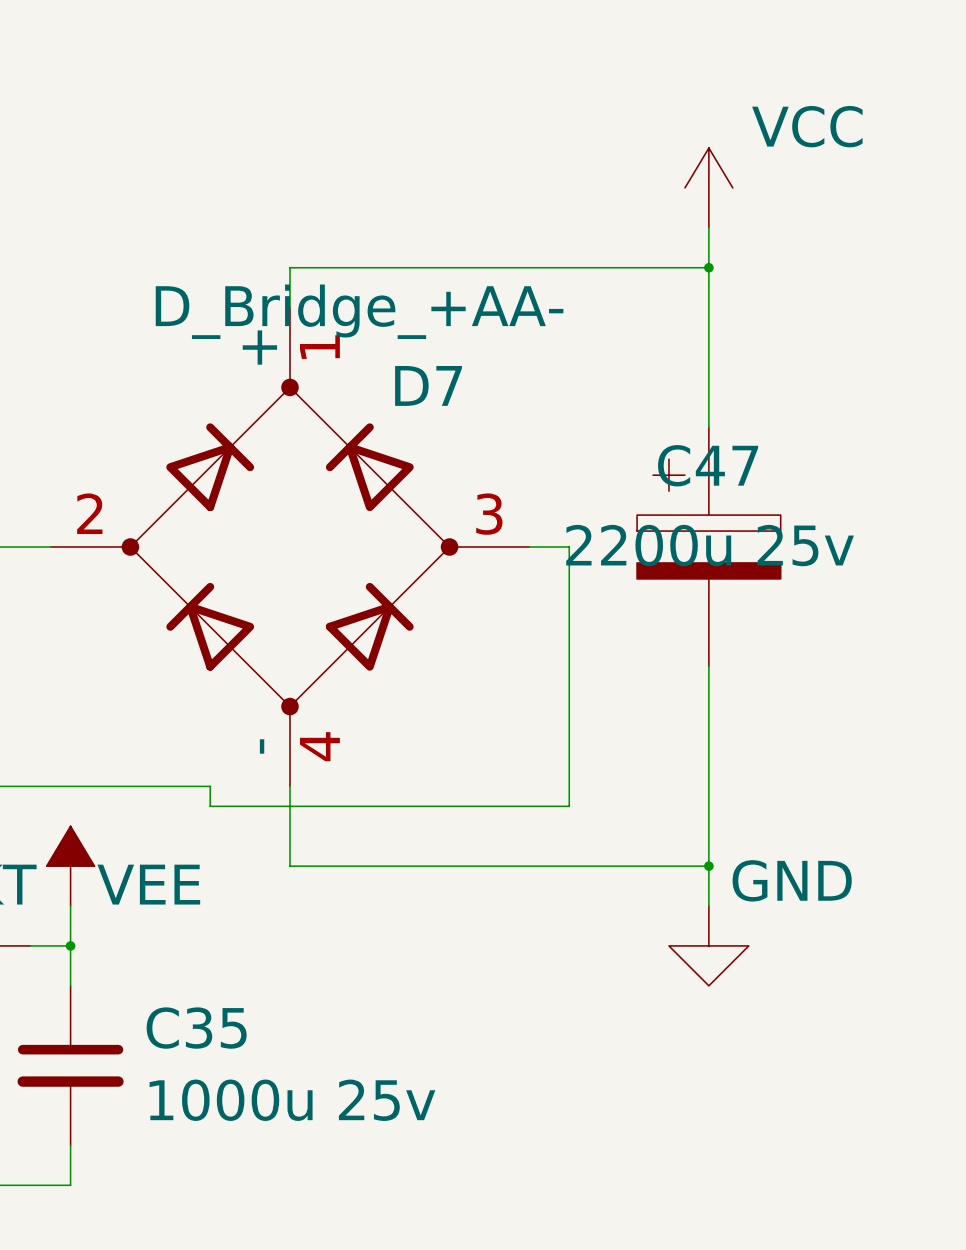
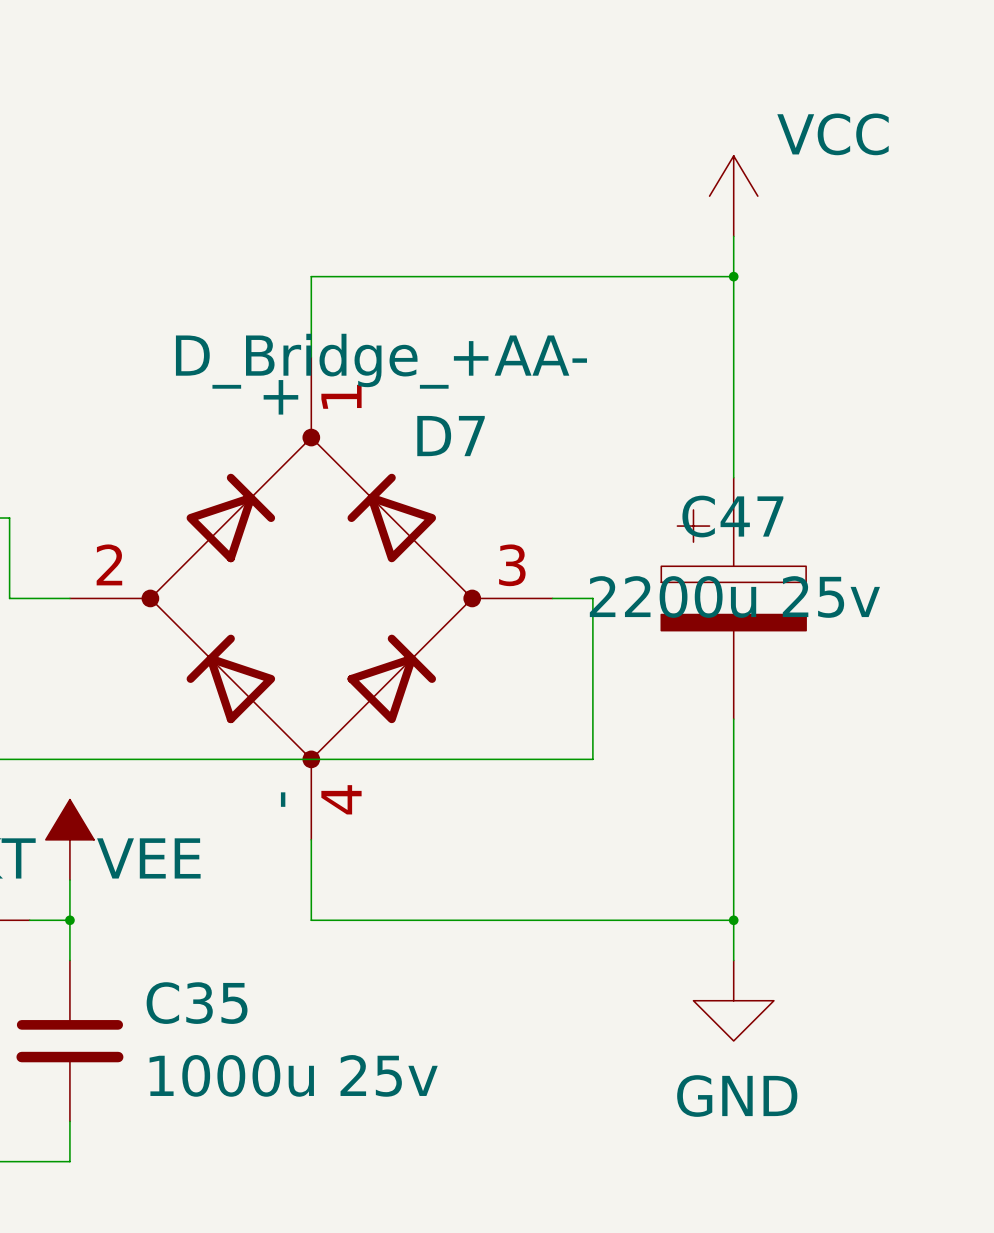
power symbol position: VCC (708, 187) -> VCC (733, 196)
wire: (708, 227) (708, 427) -> none
wire: (708, 267) (289, 267) (289, 307) -> none
junction position: (708, 267) -> (733, 276)
wire: none -> (733, 236) (733, 477)
wire: none -> (733, 276) (311, 276) (311, 357)
wire: (10, 547) (50, 547) -> (9, 518) (9, 598) (69, 598)
D7 position: (289, 547) -> (311, 598)
wire: (529, 547) (569, 547) (569, 806) (210, 806) (210, 786) -> (552, 598) (592, 598) (592, 759) (210, 759)
C47 position: (708, 547) -> (733, 598)
wire: (708, 666) (708, 906) -> (733, 719) (733, 960)
wire: (289, 786) (289, 866) (708, 866) -> (311, 839) (311, 920) (733, 920)
junction position: (708, 866) -> (733, 920)
power symbol text position: GND (792, 880) -> GND (737, 1096)
power symbol position: GND (708, 945) -> GND (733, 1000)

